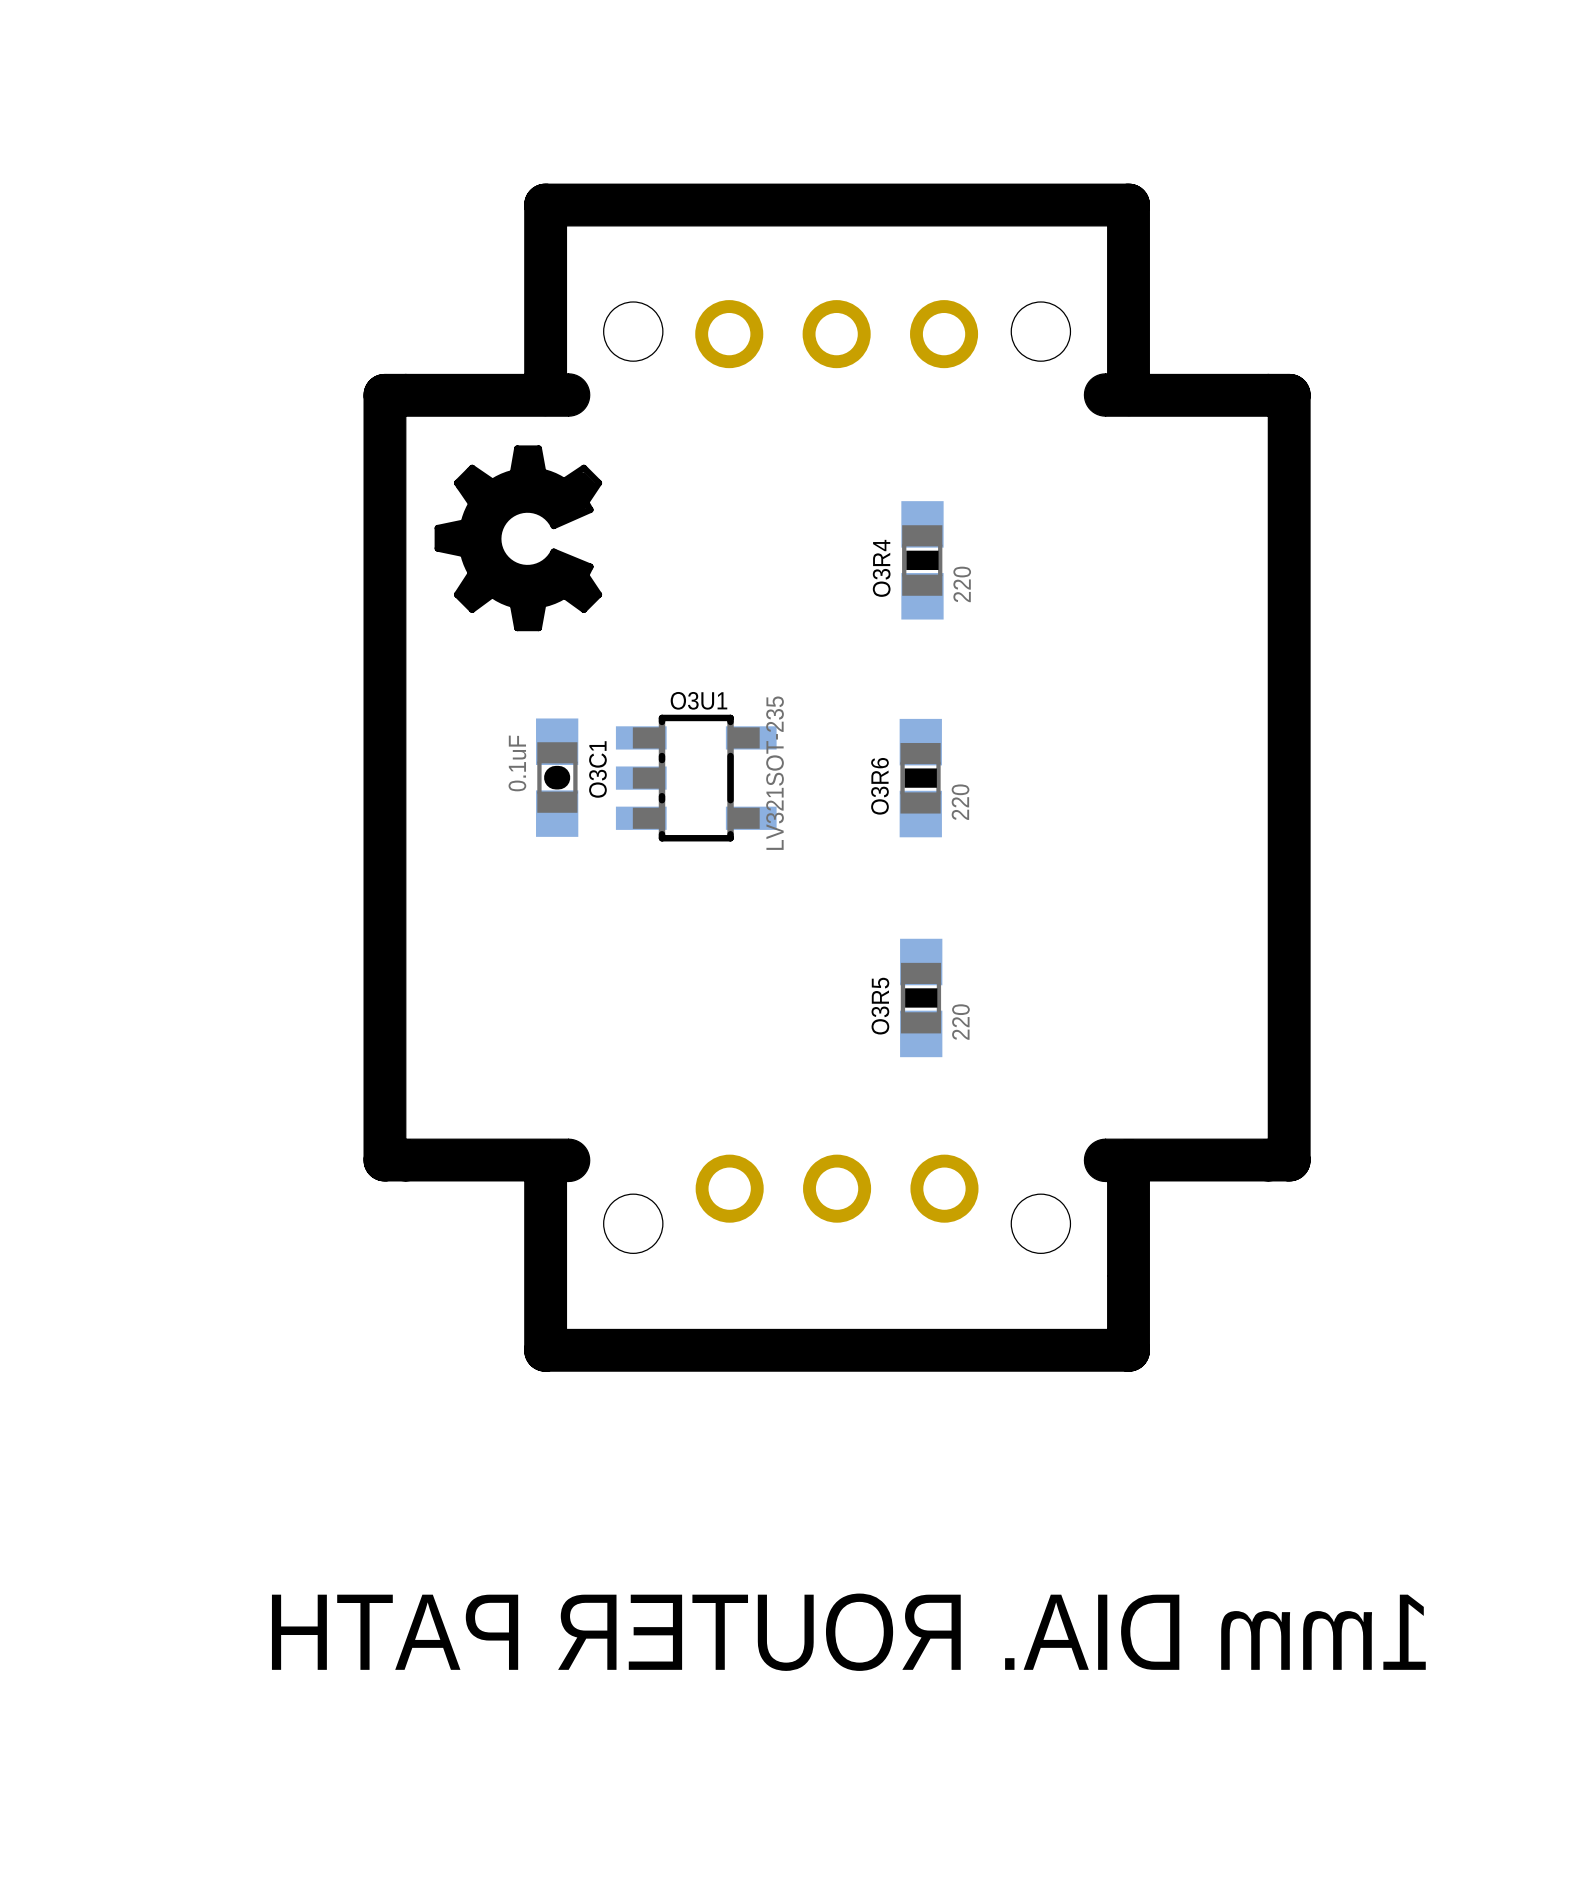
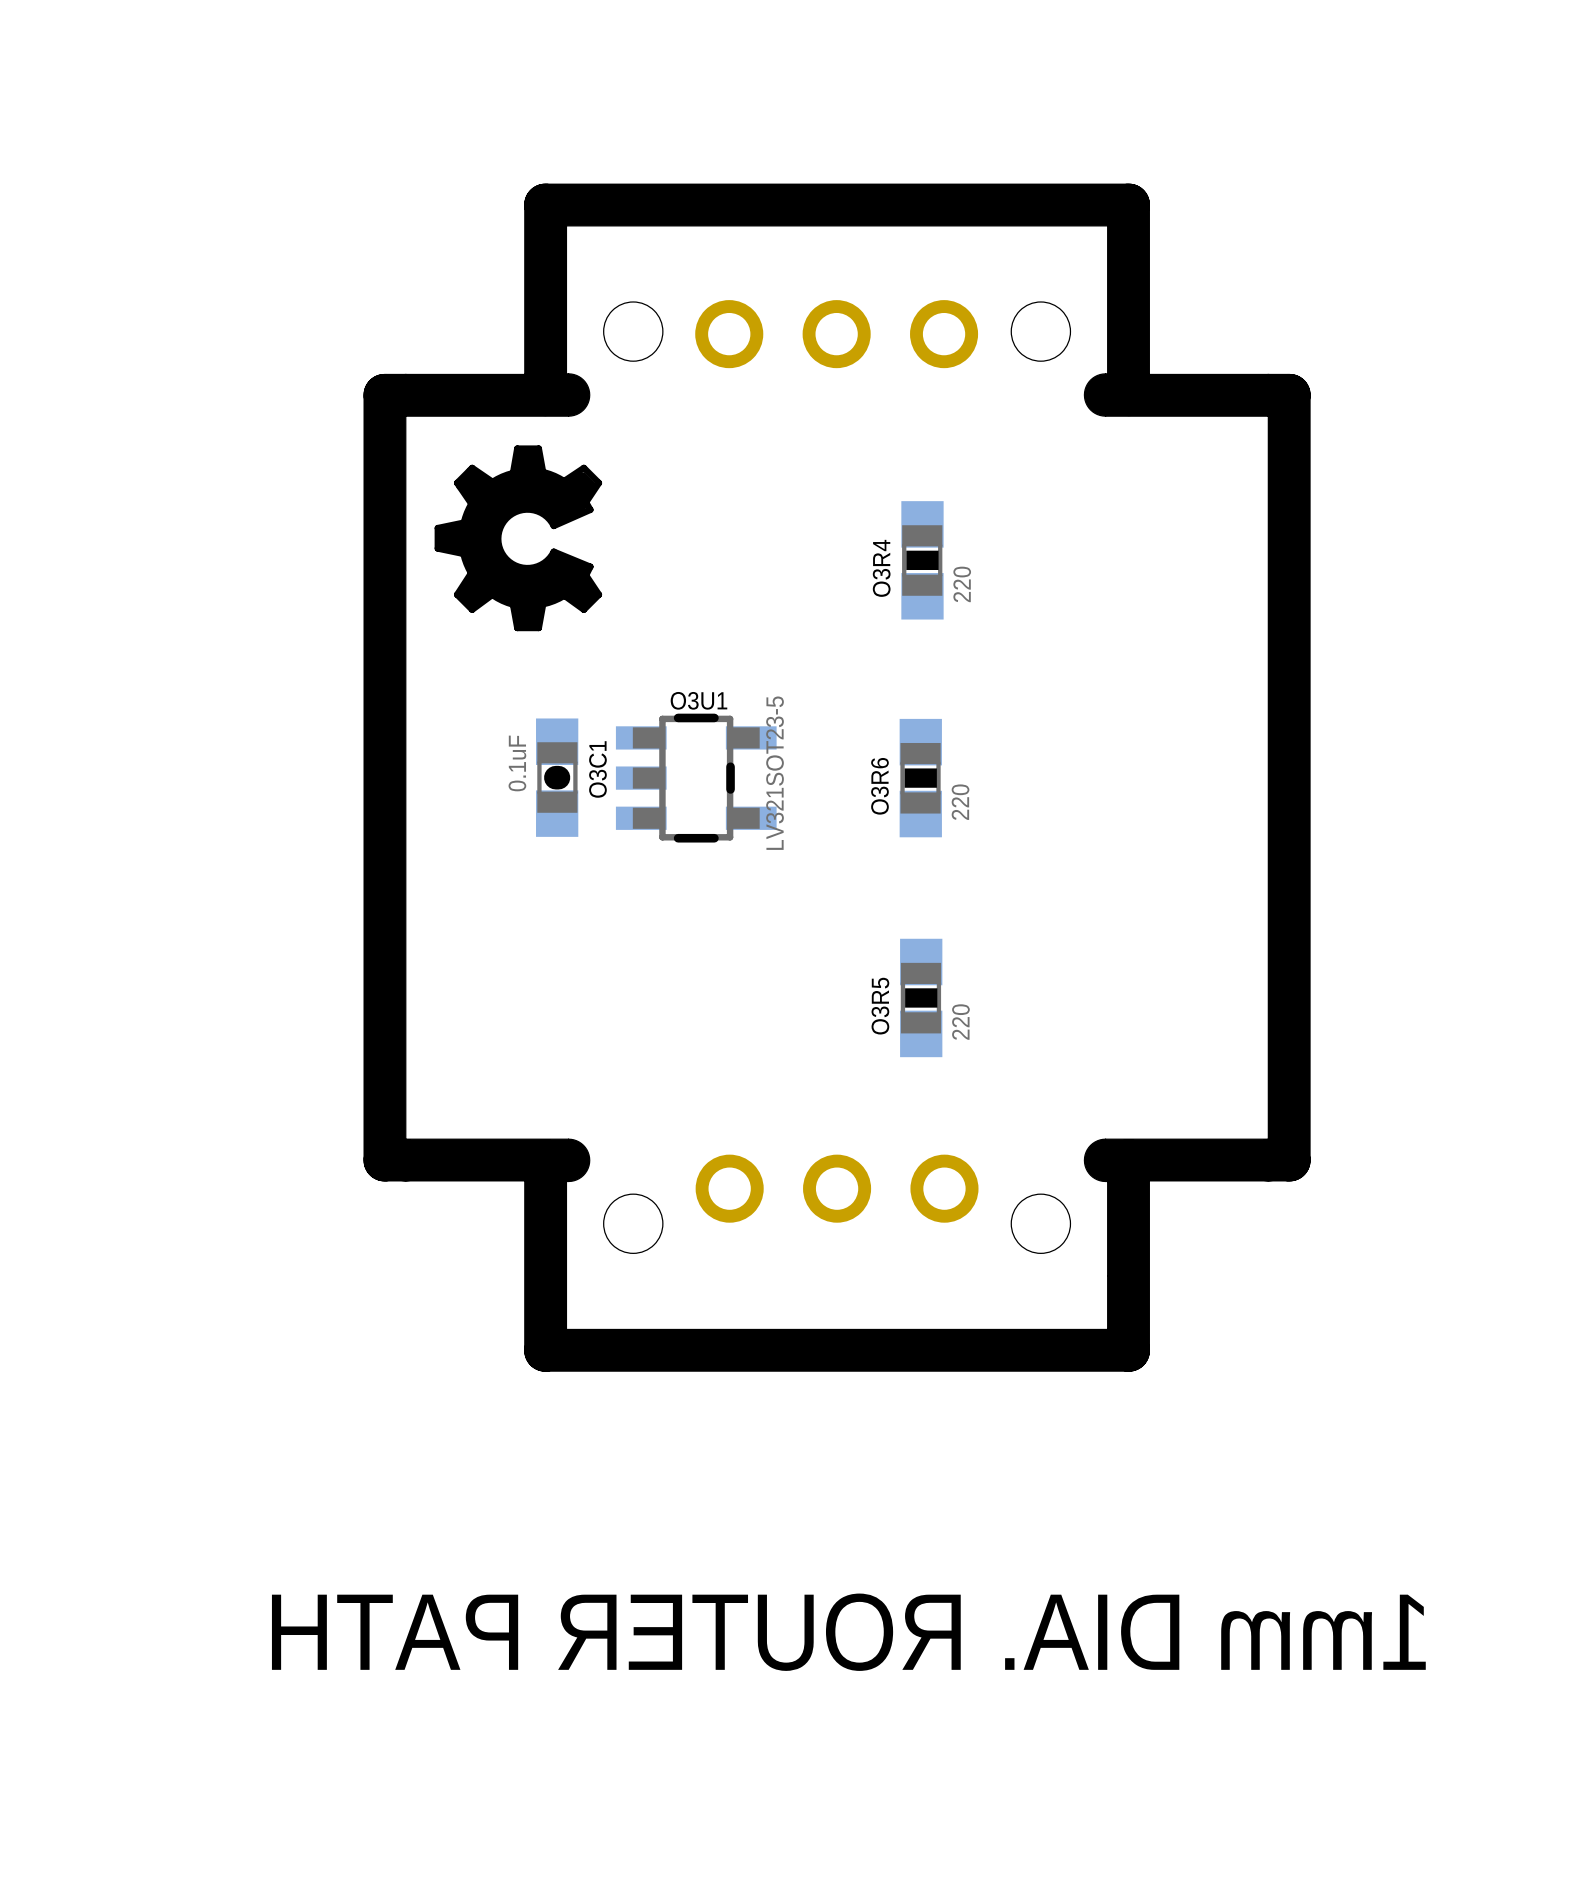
O3U1 footprint: [615, 714, 777, 842] -> [615, 713, 777, 843]
O3U1 value: LV321SOT-235 (775, 773) -> LV321SOT23-5 (775, 773)

